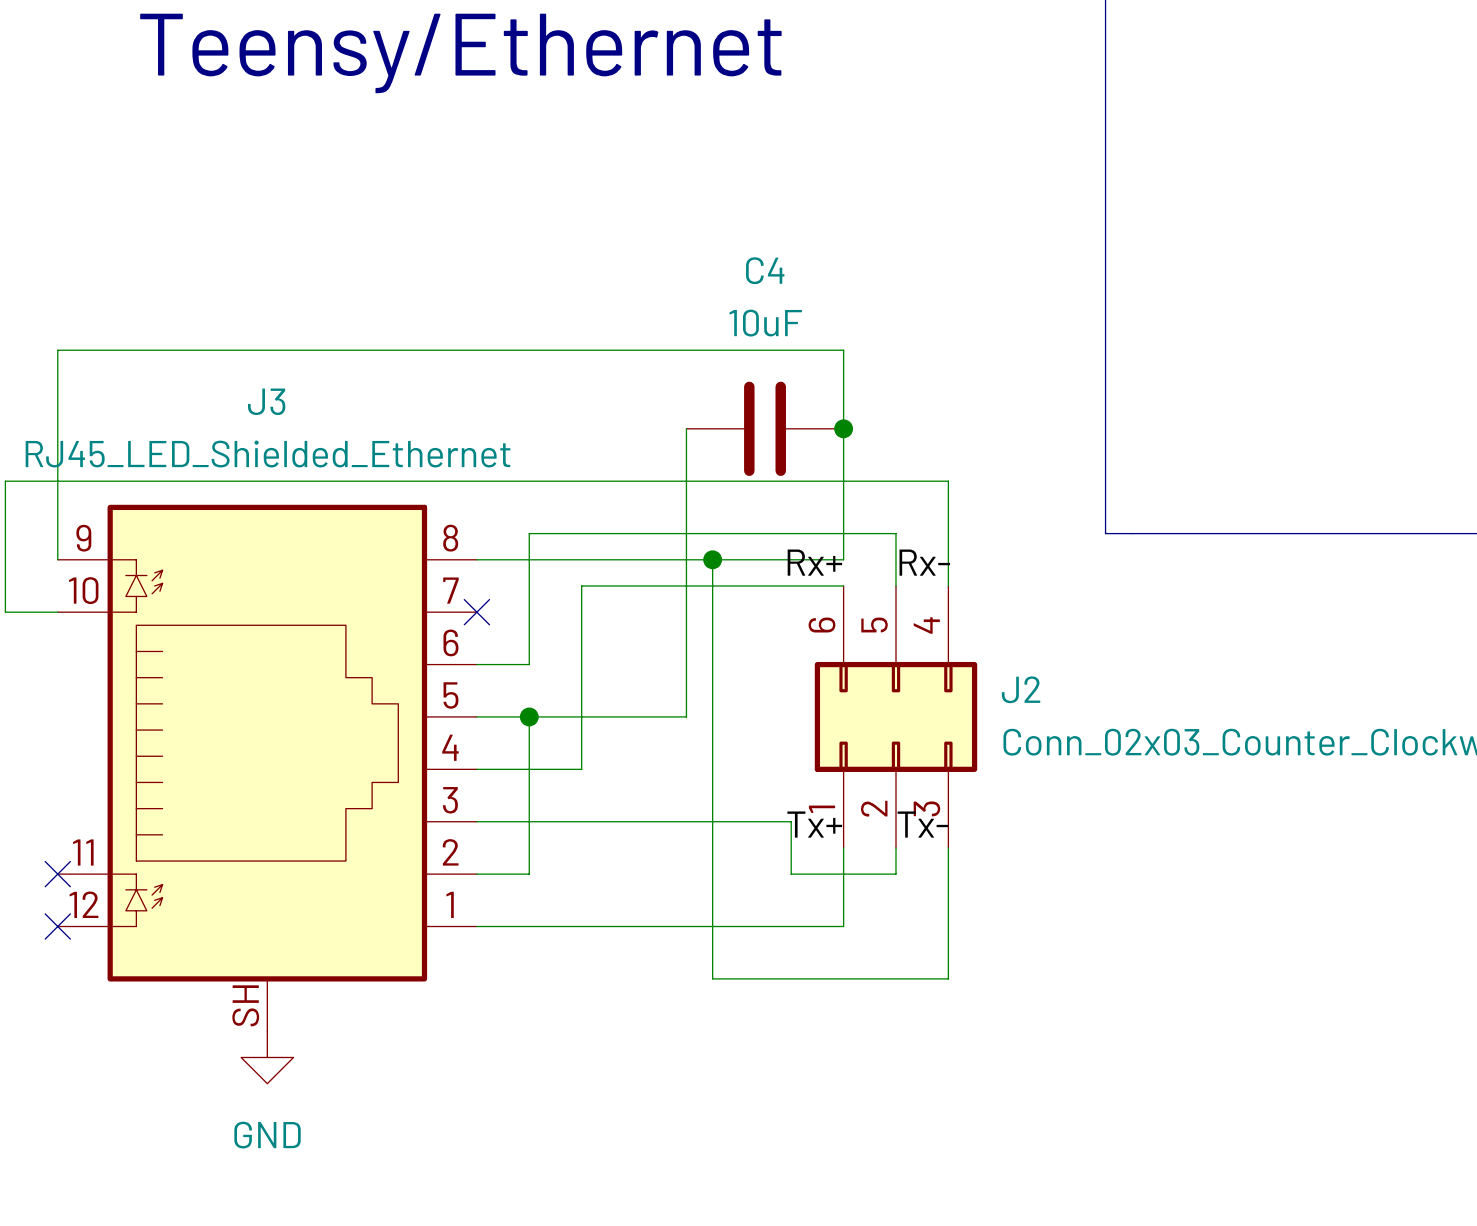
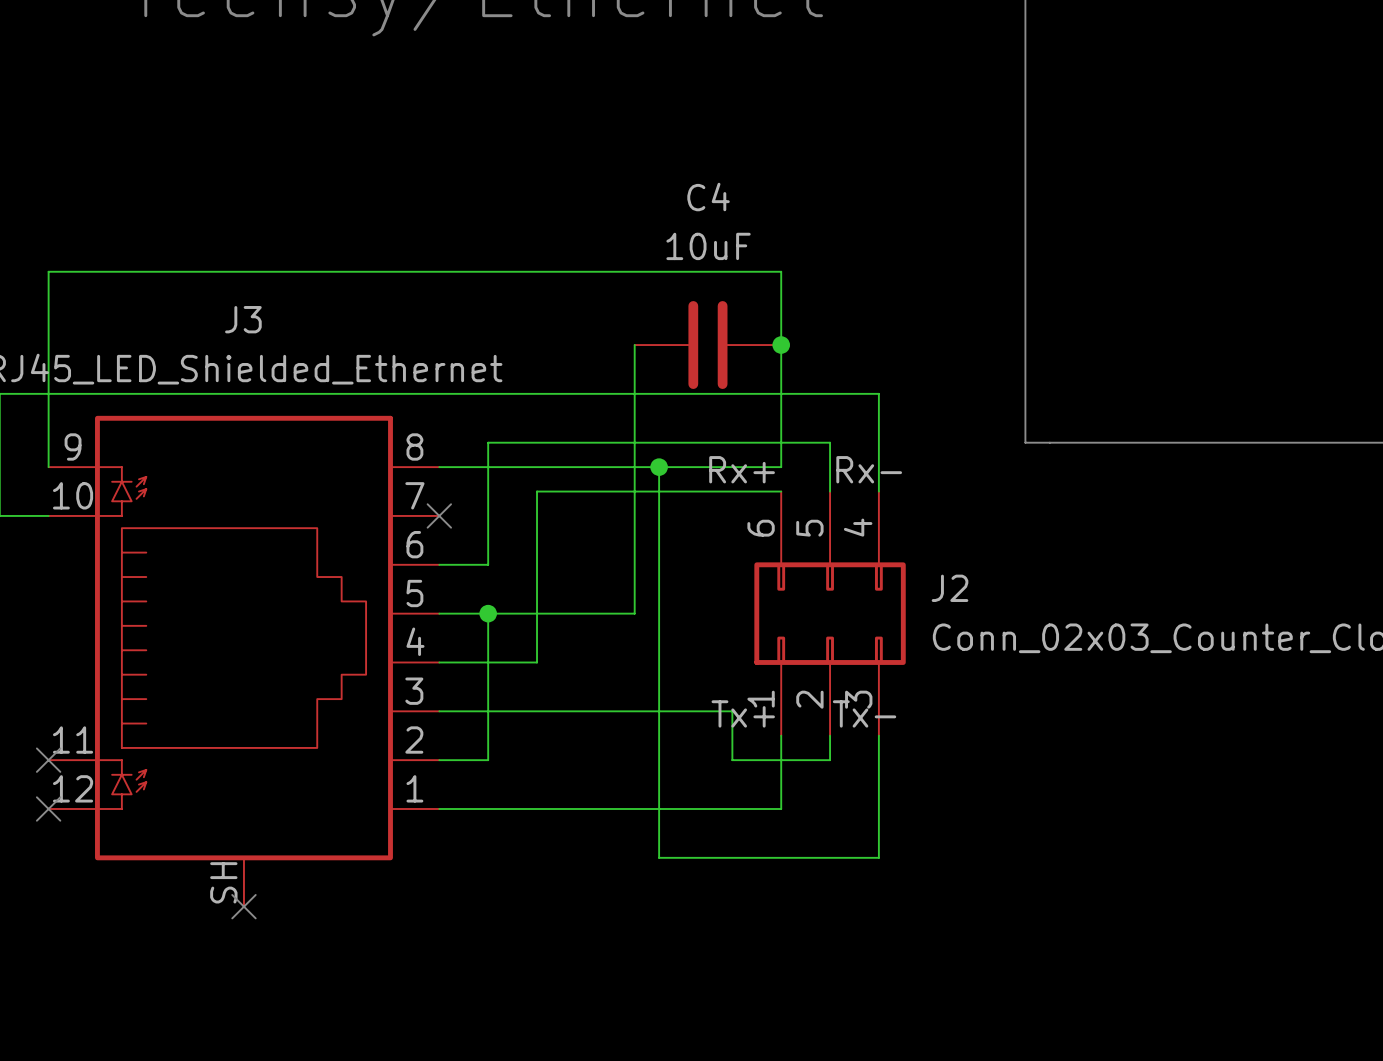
no-connect mark: none -> (243, 906)
power symbol: GND (267, 1057) -> none

